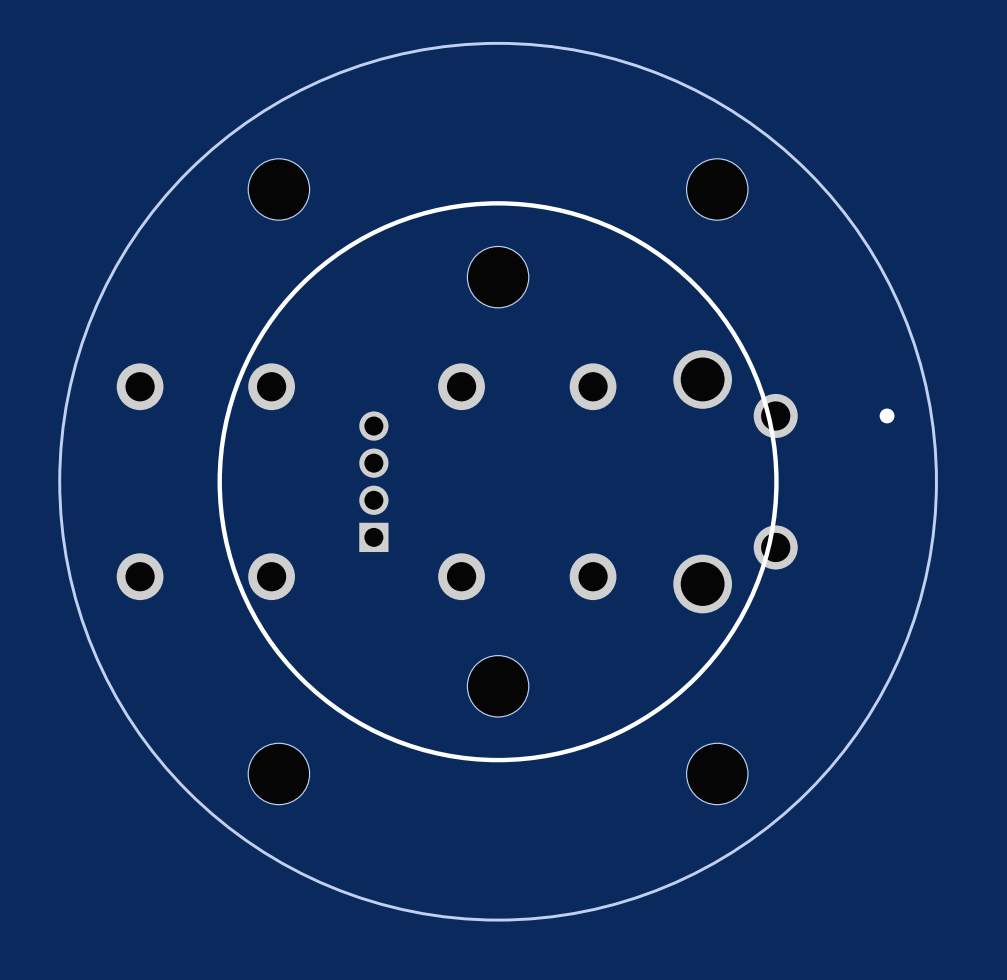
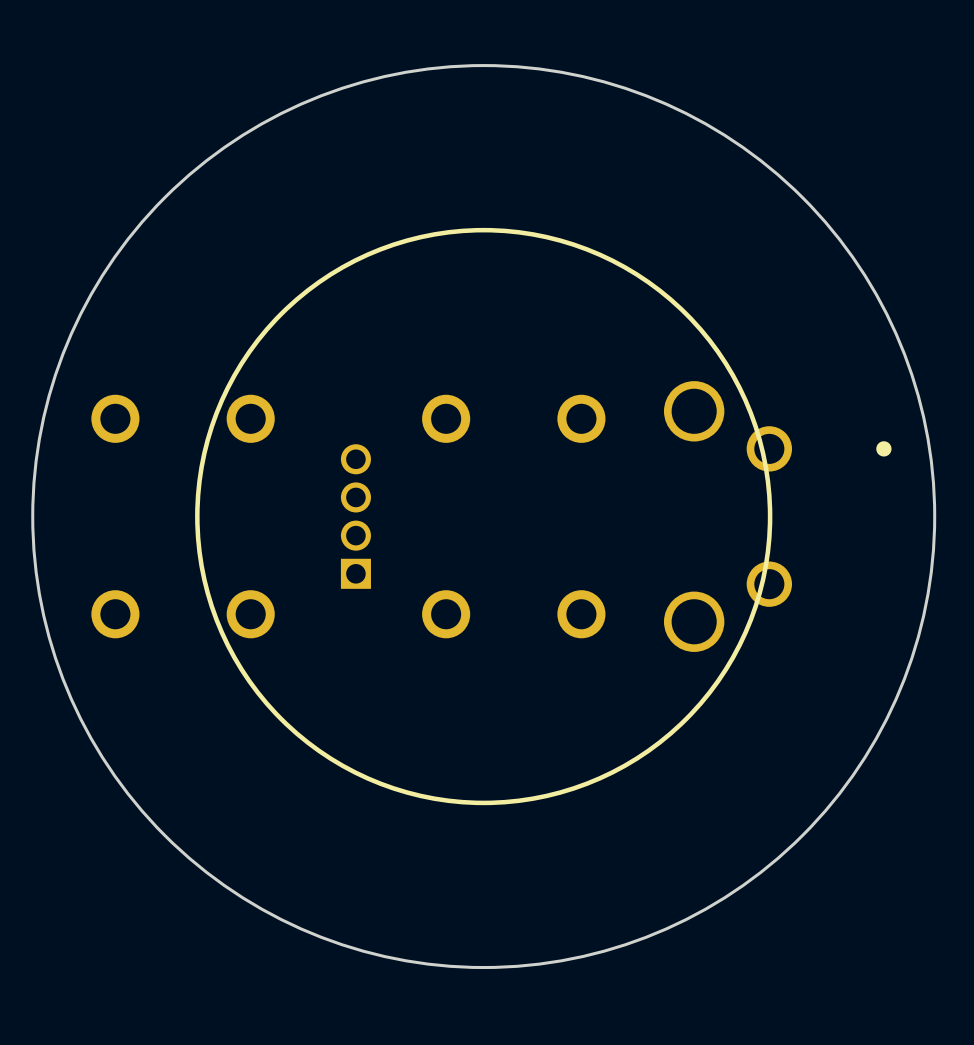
part: (278, 189) -> none
part: (717, 189) -> none
part: (498, 277) -> none
part: (498, 686) -> none
part: (278, 773) -> none
part: (717, 773) -> none

